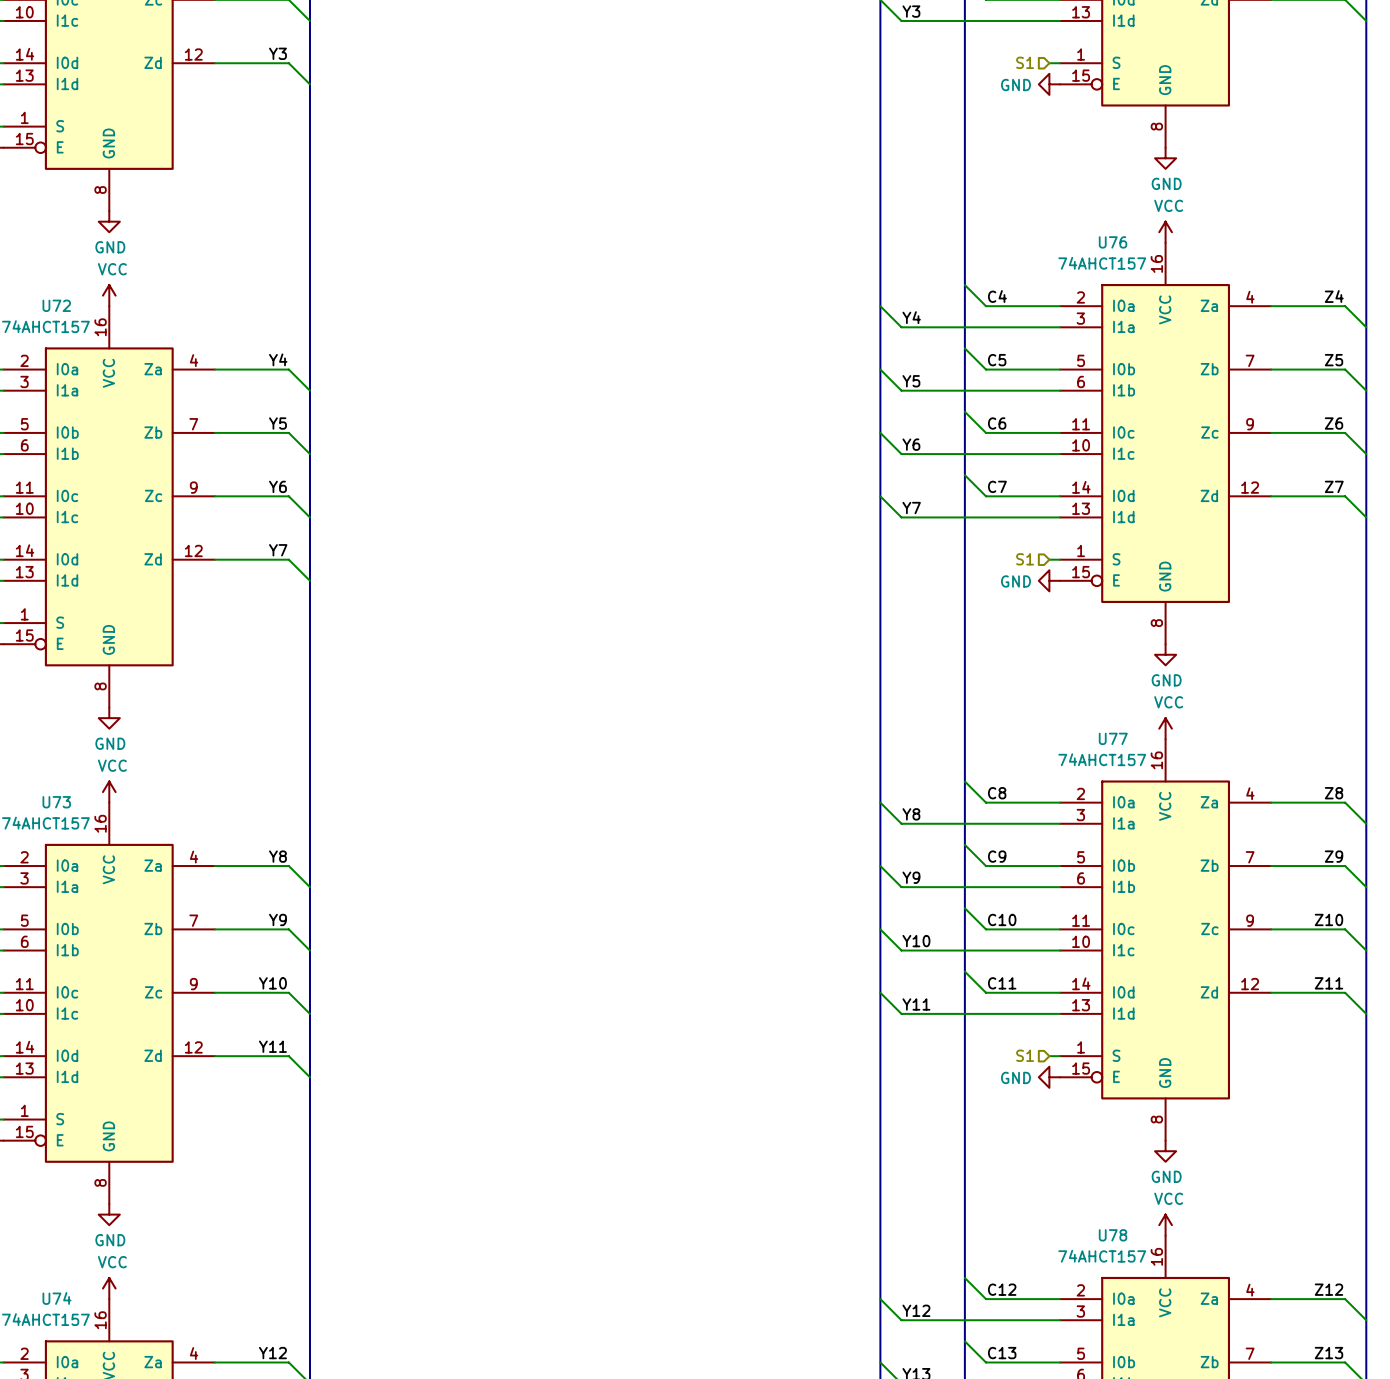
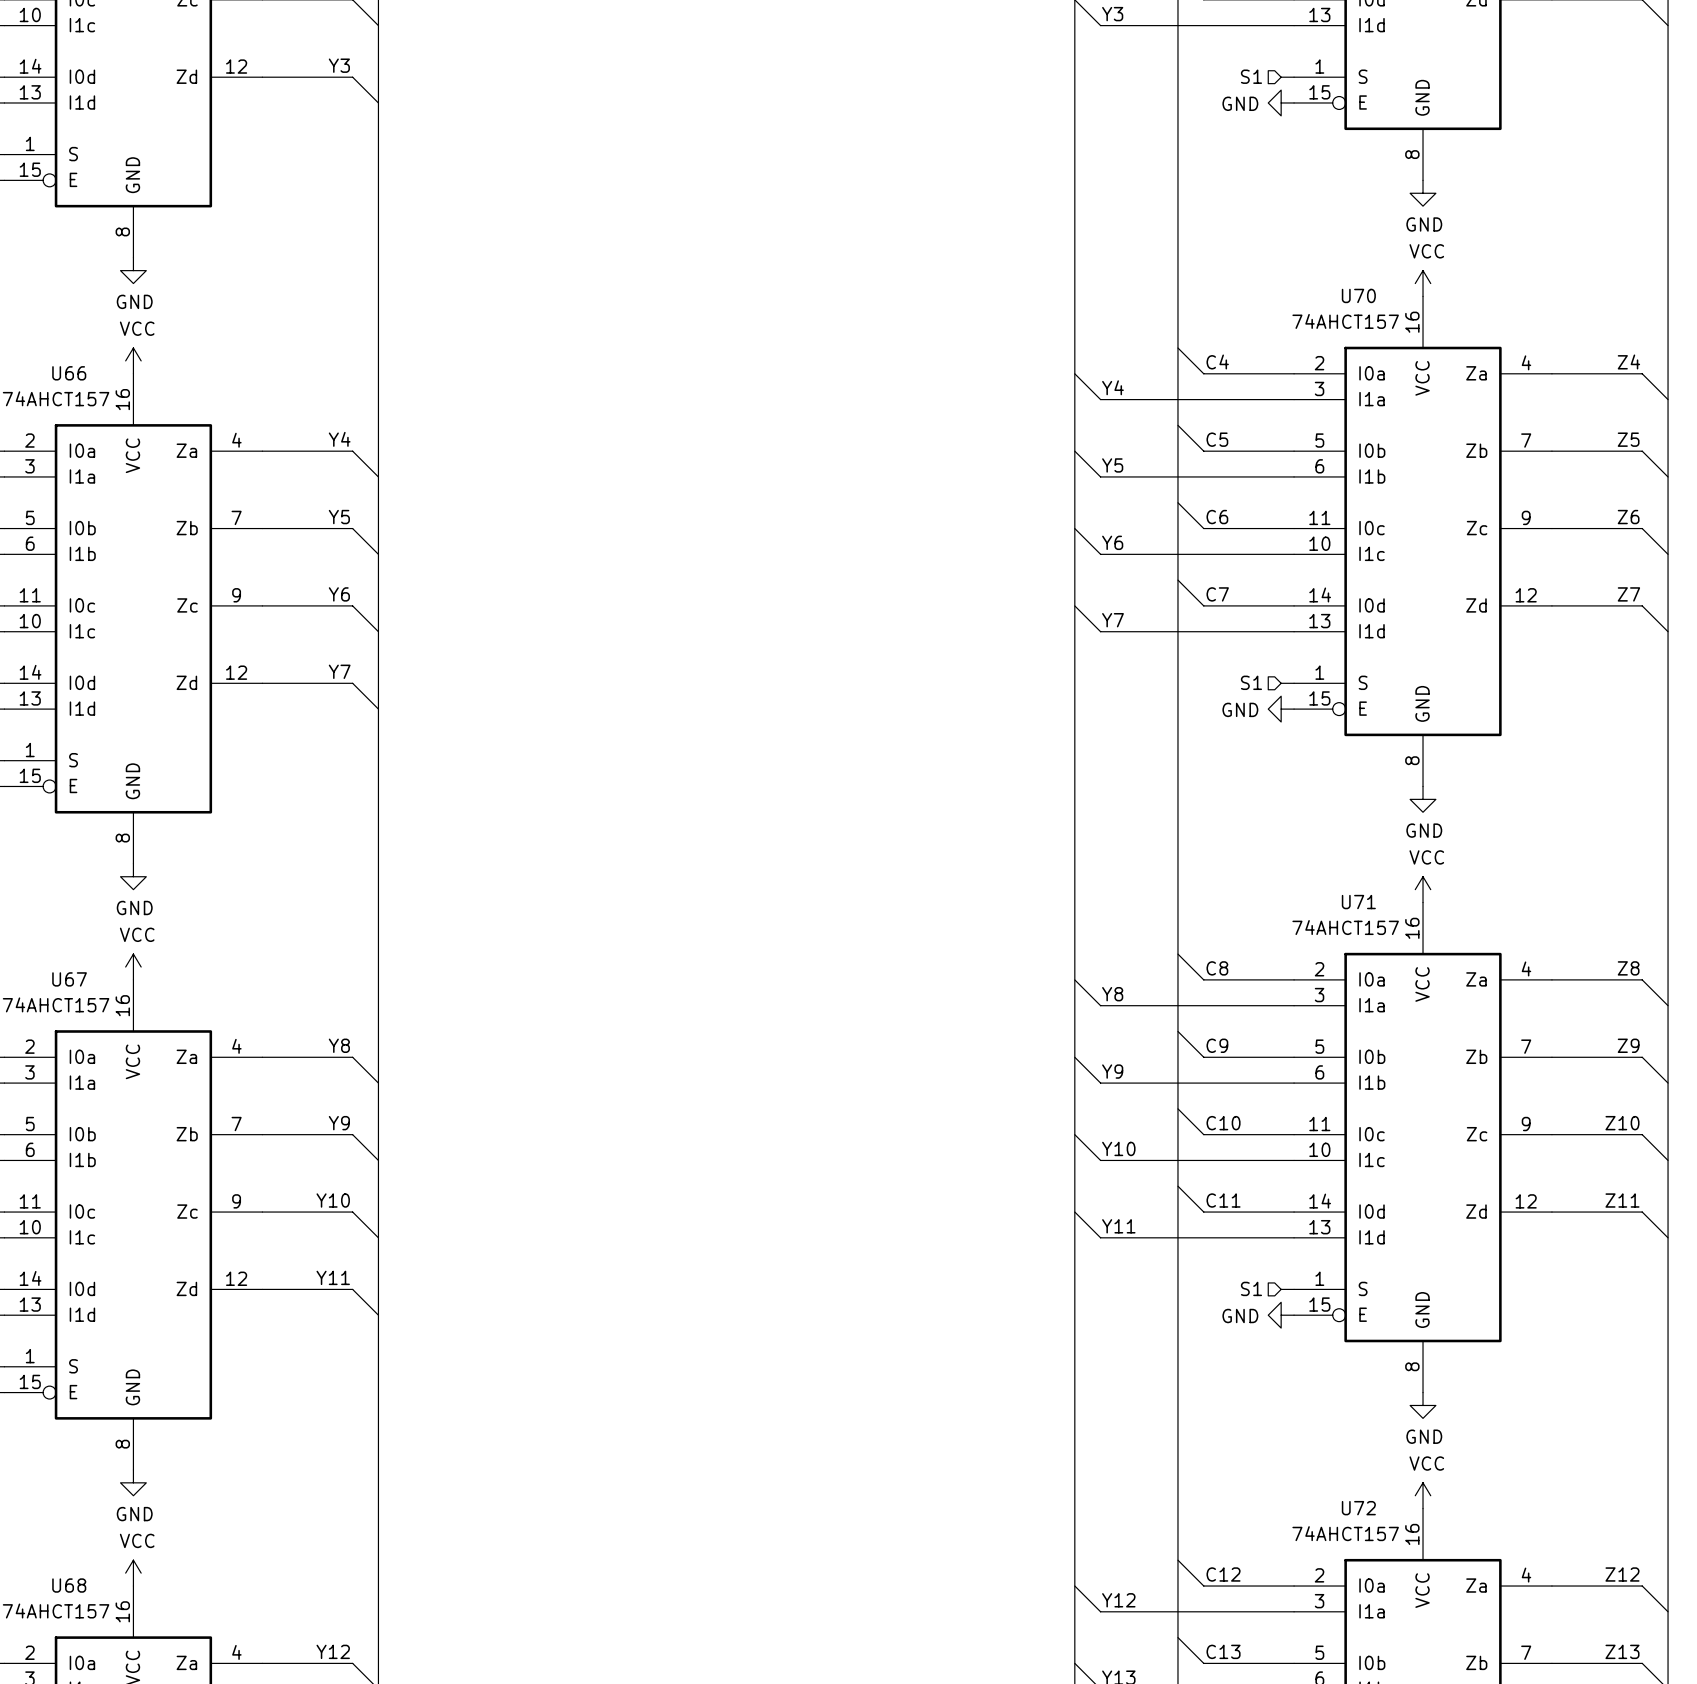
U76 name: U76 (1113, 242) -> U70 (1358, 295)
U72 name: U72 (56, 305) -> U66 (69, 373)
U77 name: U77 (1113, 738) -> U71 (1358, 902)
U73 name: U73 (56, 802) -> U67 (69, 979)
U78 name: U78 (1113, 1235) -> U72 (1358, 1508)
U74 name: U74 (56, 1298) -> U68 (69, 1585)

